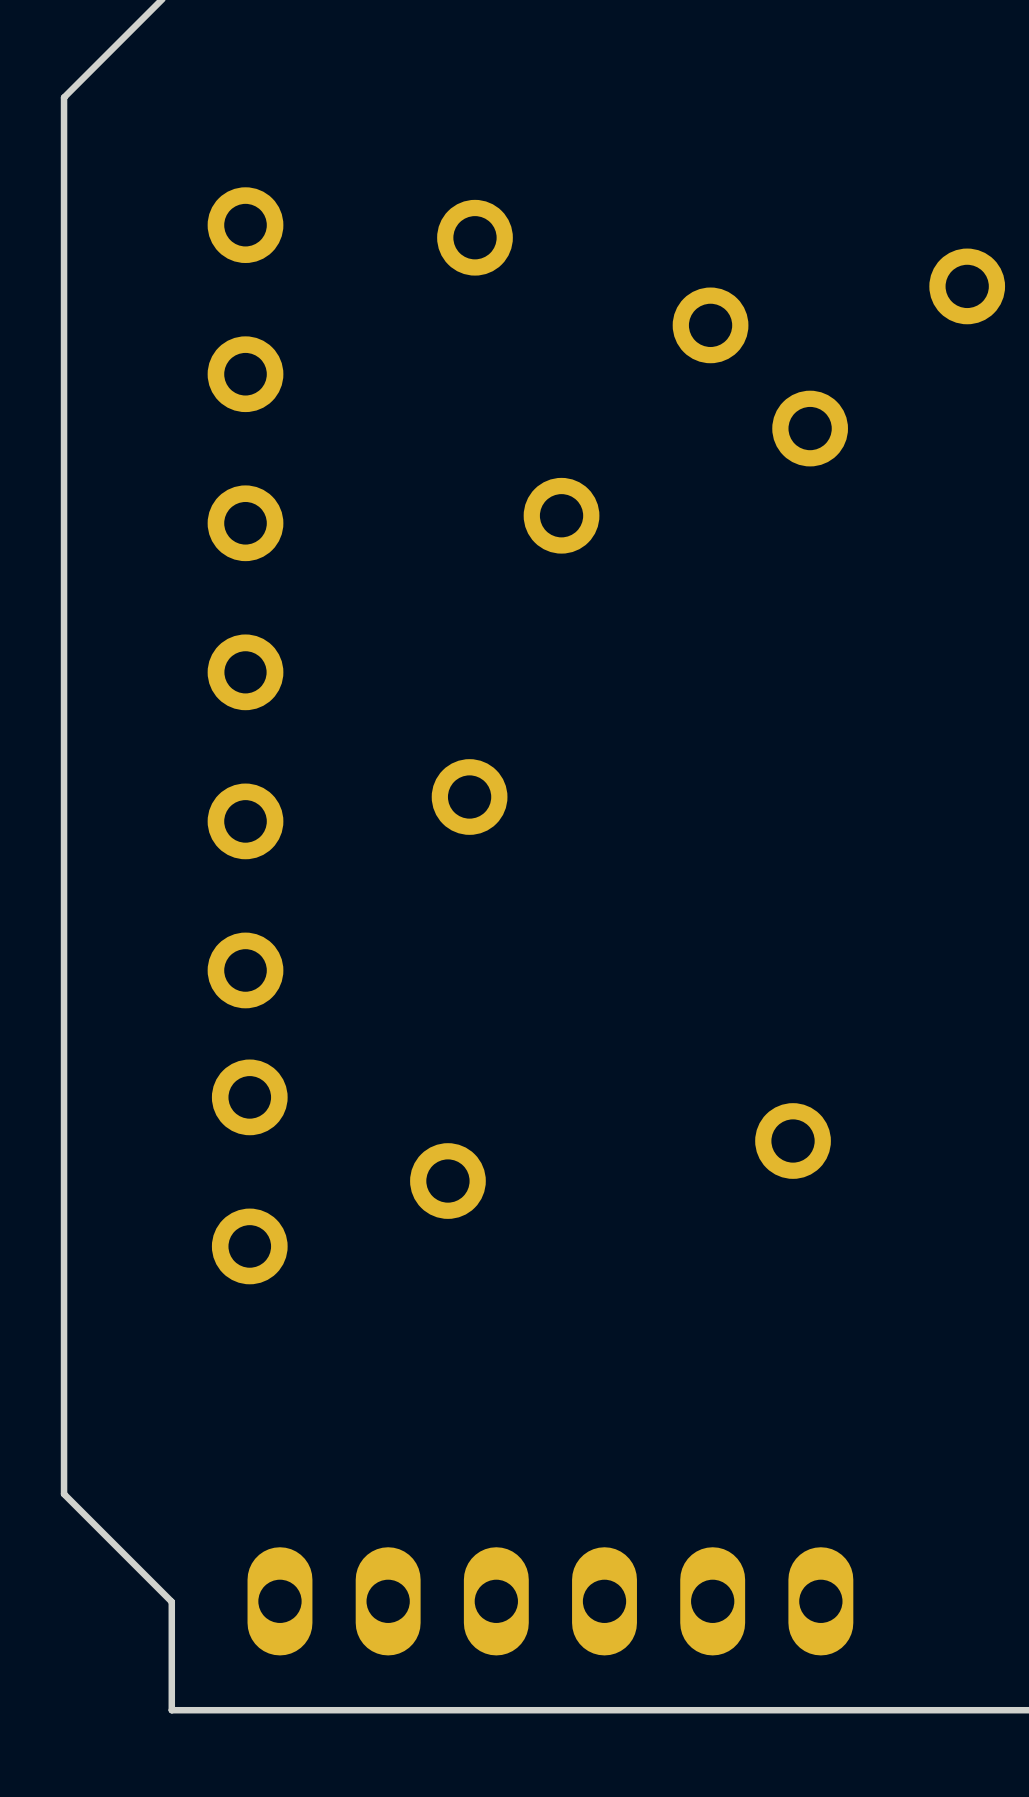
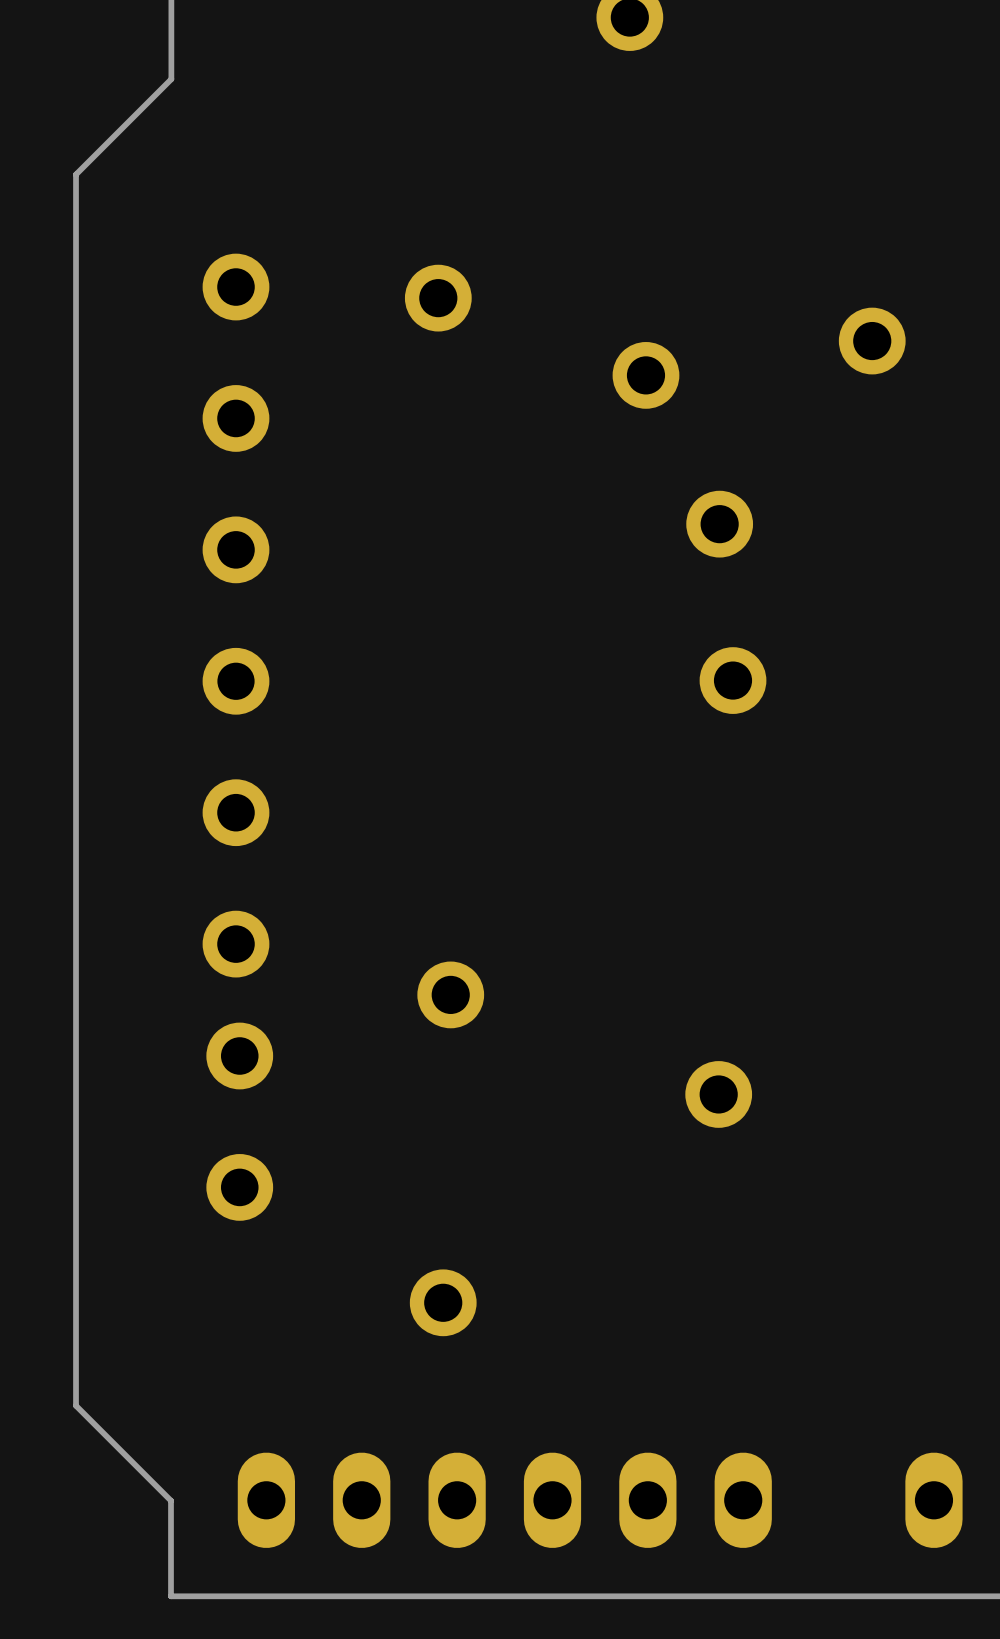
part position: (810, 428) -> (719, 524)
part: (561, 515) -> none
part: none -> (733, 680)
part: (469, 797) -> none
part: none -> (450, 994)
part: (447, 1181) -> none
part: none -> (443, 1302)

